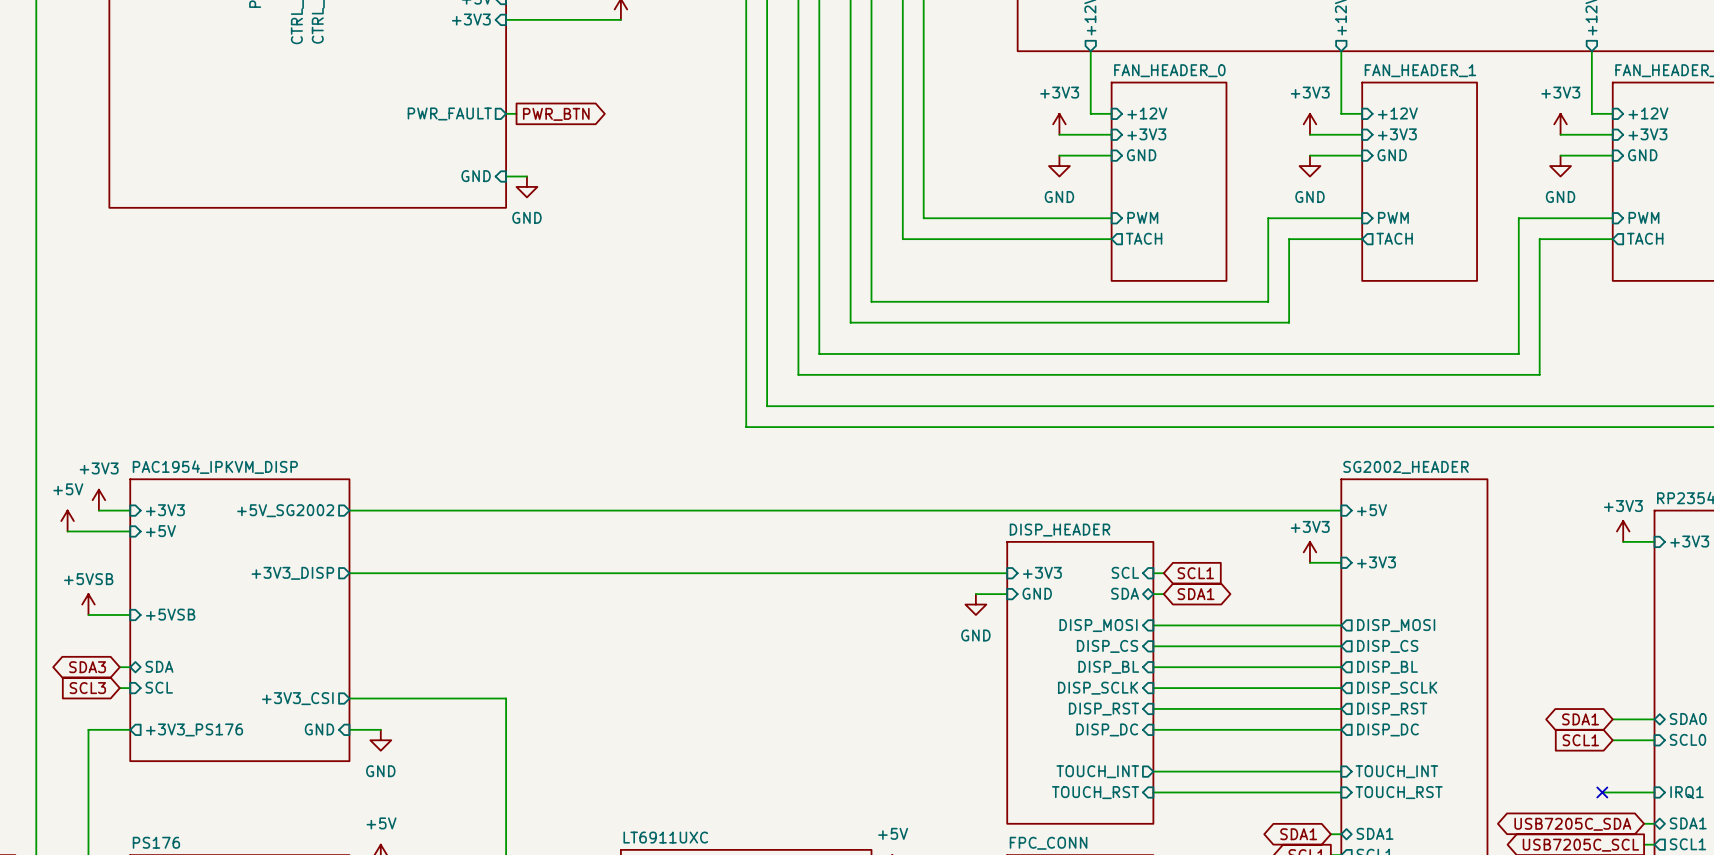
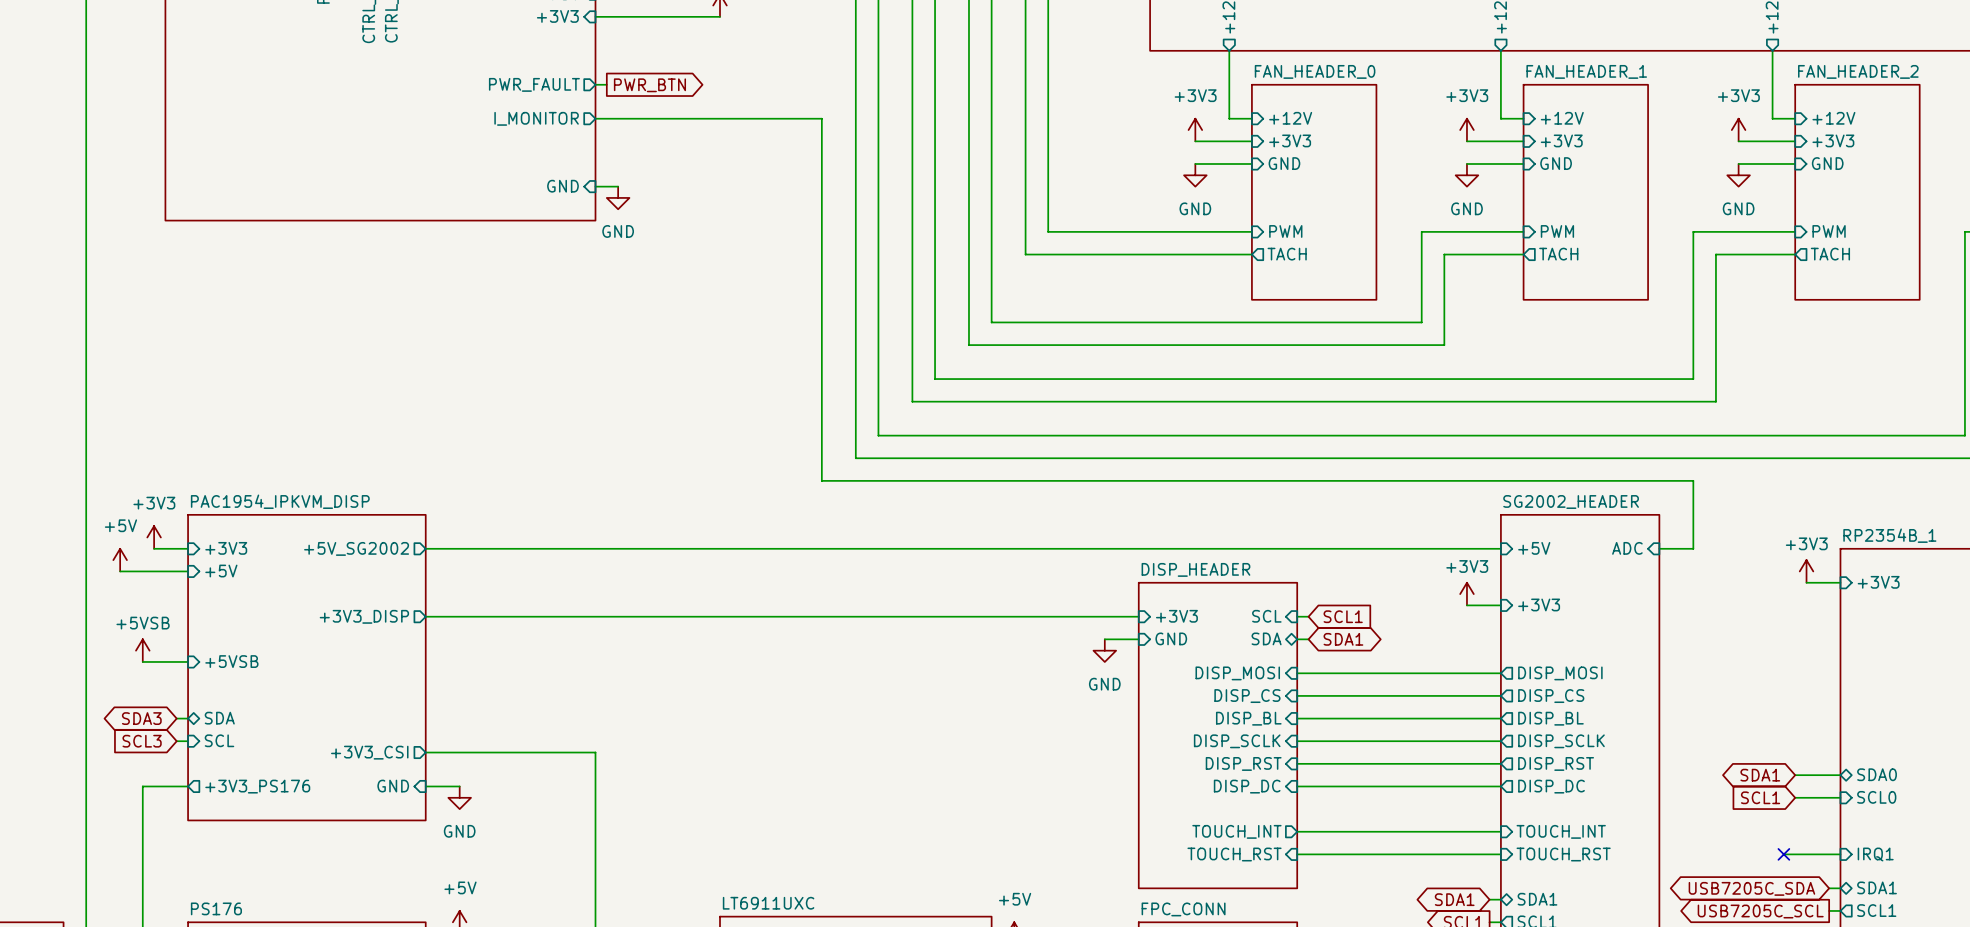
sheet pin: none -> PWR_FAULT (534, 84)
wire: none -> (595, 84) (606, 84)
sheet pin: PWR_FAULT (449, 113) -> I_MONITOR (536, 118)
wire: none -> (606, 118) (821, 118) (821, 480) (1693, 480) (1693, 548) (1659, 548)
global label position: PWR_BTN (556, 114) -> PWR_BTN (649, 85)
sheet pin: none -> ADC (1627, 548)

